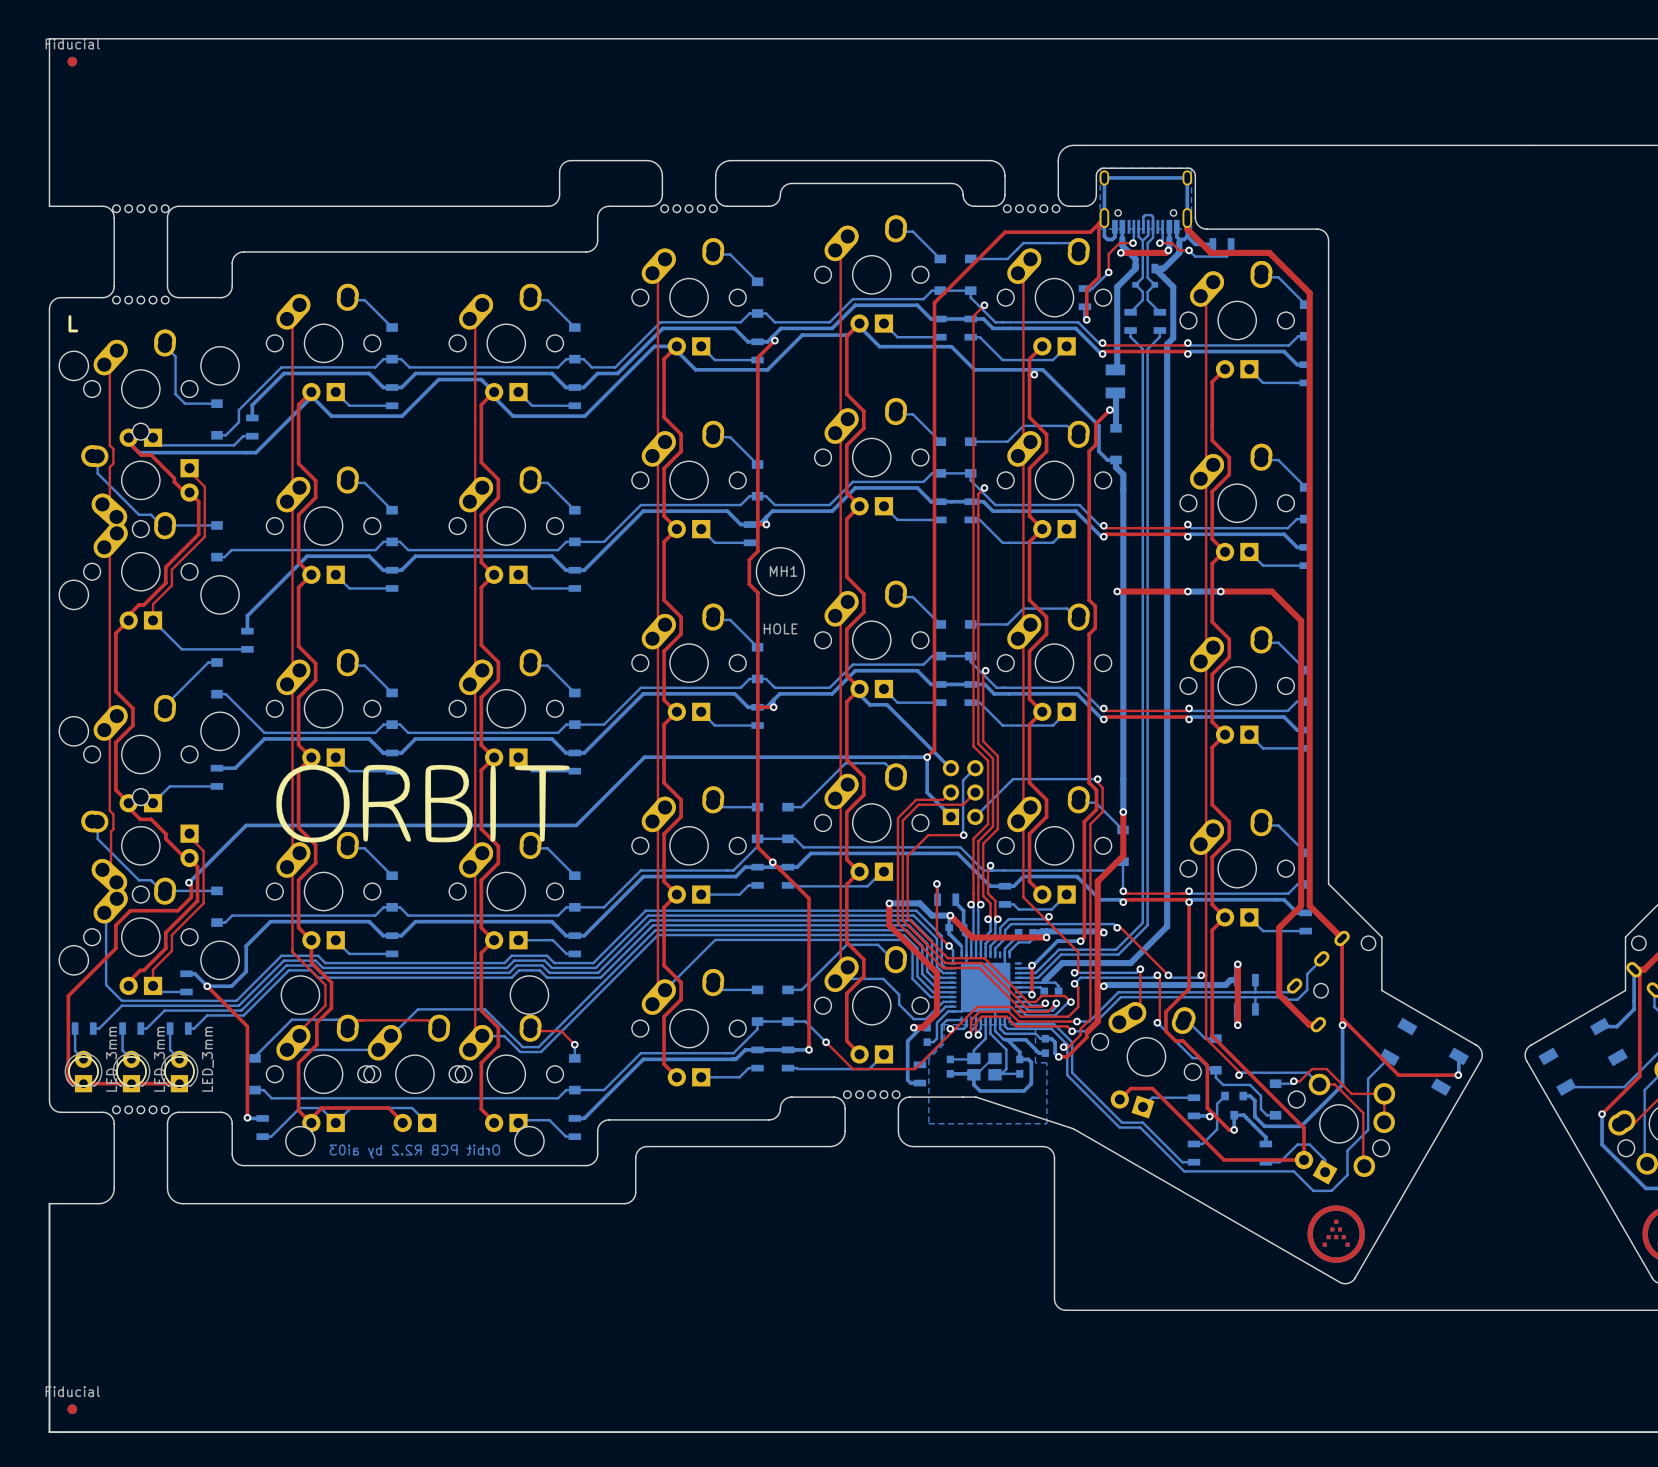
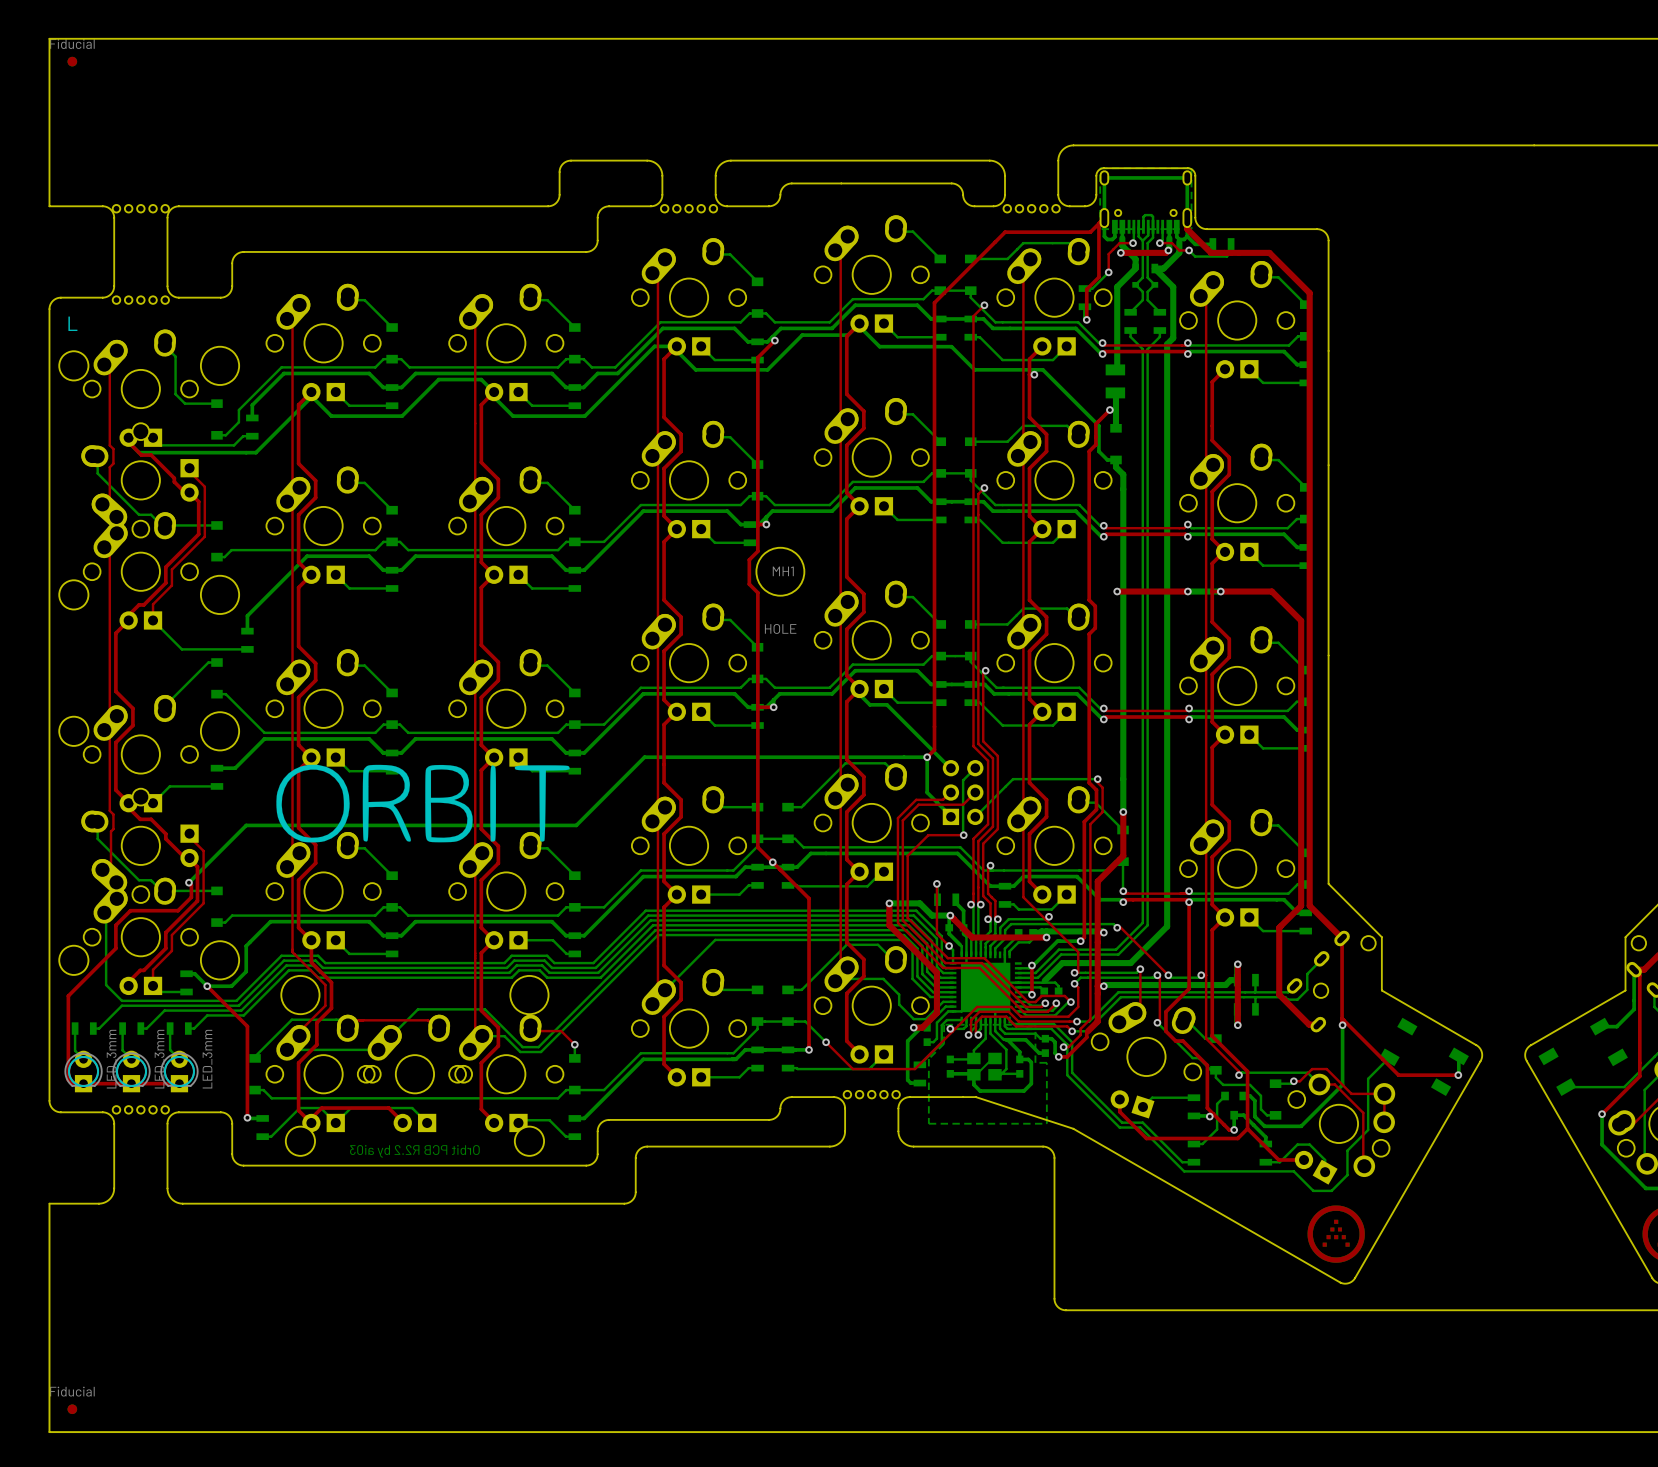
top track: (1247, 1071) (1304, 1127) (1304, 1159) -> (1247, 1071) (1247, 1128)
top track: (1119, 1099) (1130, 1088) (1152, 1088) (1223, 1159) (1278, 1159) -> (1119, 1099) (1119, 1111) (1146, 1138) (1237, 1138) (1247, 1128)
top track: none -> (1247, 1128) (1278, 1159)

